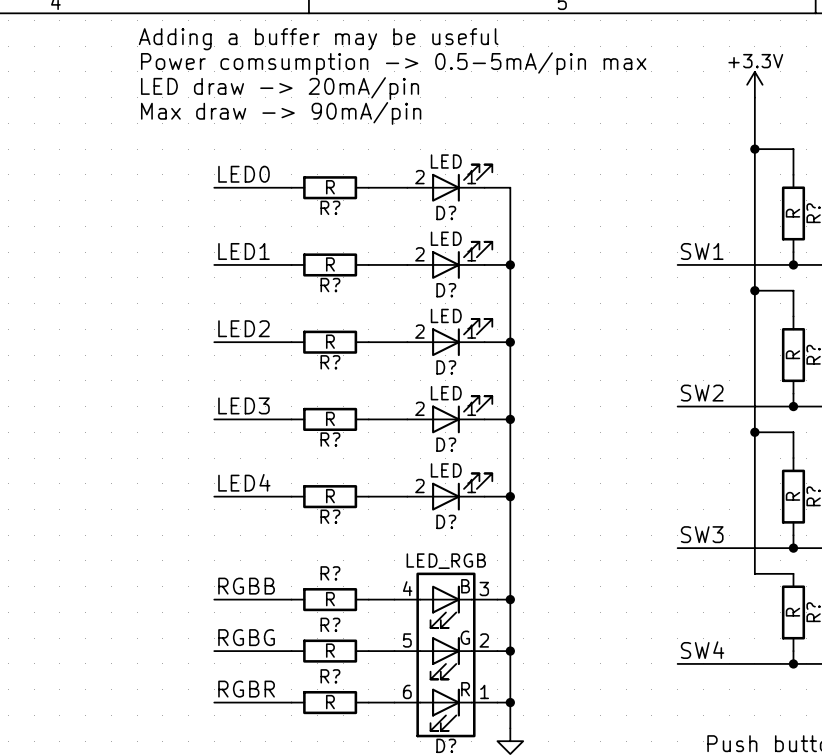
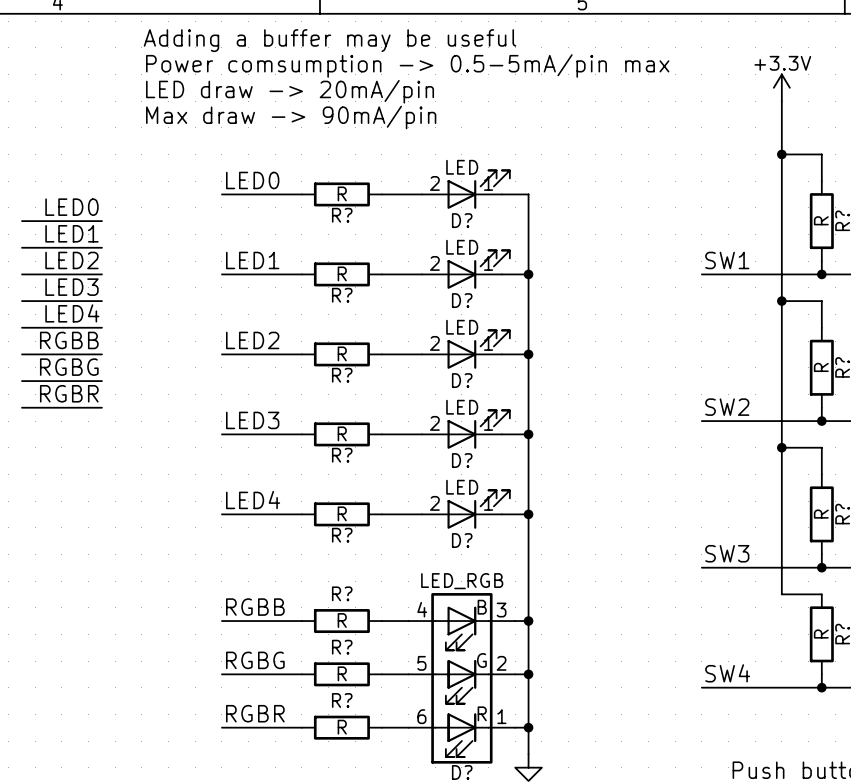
label: none -> LED0 (71, 207)
wire: none -> (21, 221) (101, 221)
label: none -> LED1 (71, 233)
wire: none -> (21, 247) (101, 247)
label: none -> LED2 (71, 260)
wire: none -> (21, 274) (101, 274)
label: none -> LED3 (71, 287)
wire: none -> (21, 301) (101, 301)
label: none -> LED4 (72, 313)
wire: none -> (21, 327) (101, 327)
label: none -> RGBB (69, 340)
wire: none -> (21, 354) (101, 354)
label: none -> RGBG (69, 367)
wire: none -> (21, 381) (101, 381)
label: none -> RGBR (69, 393)
wire: none -> (21, 407) (101, 407)

